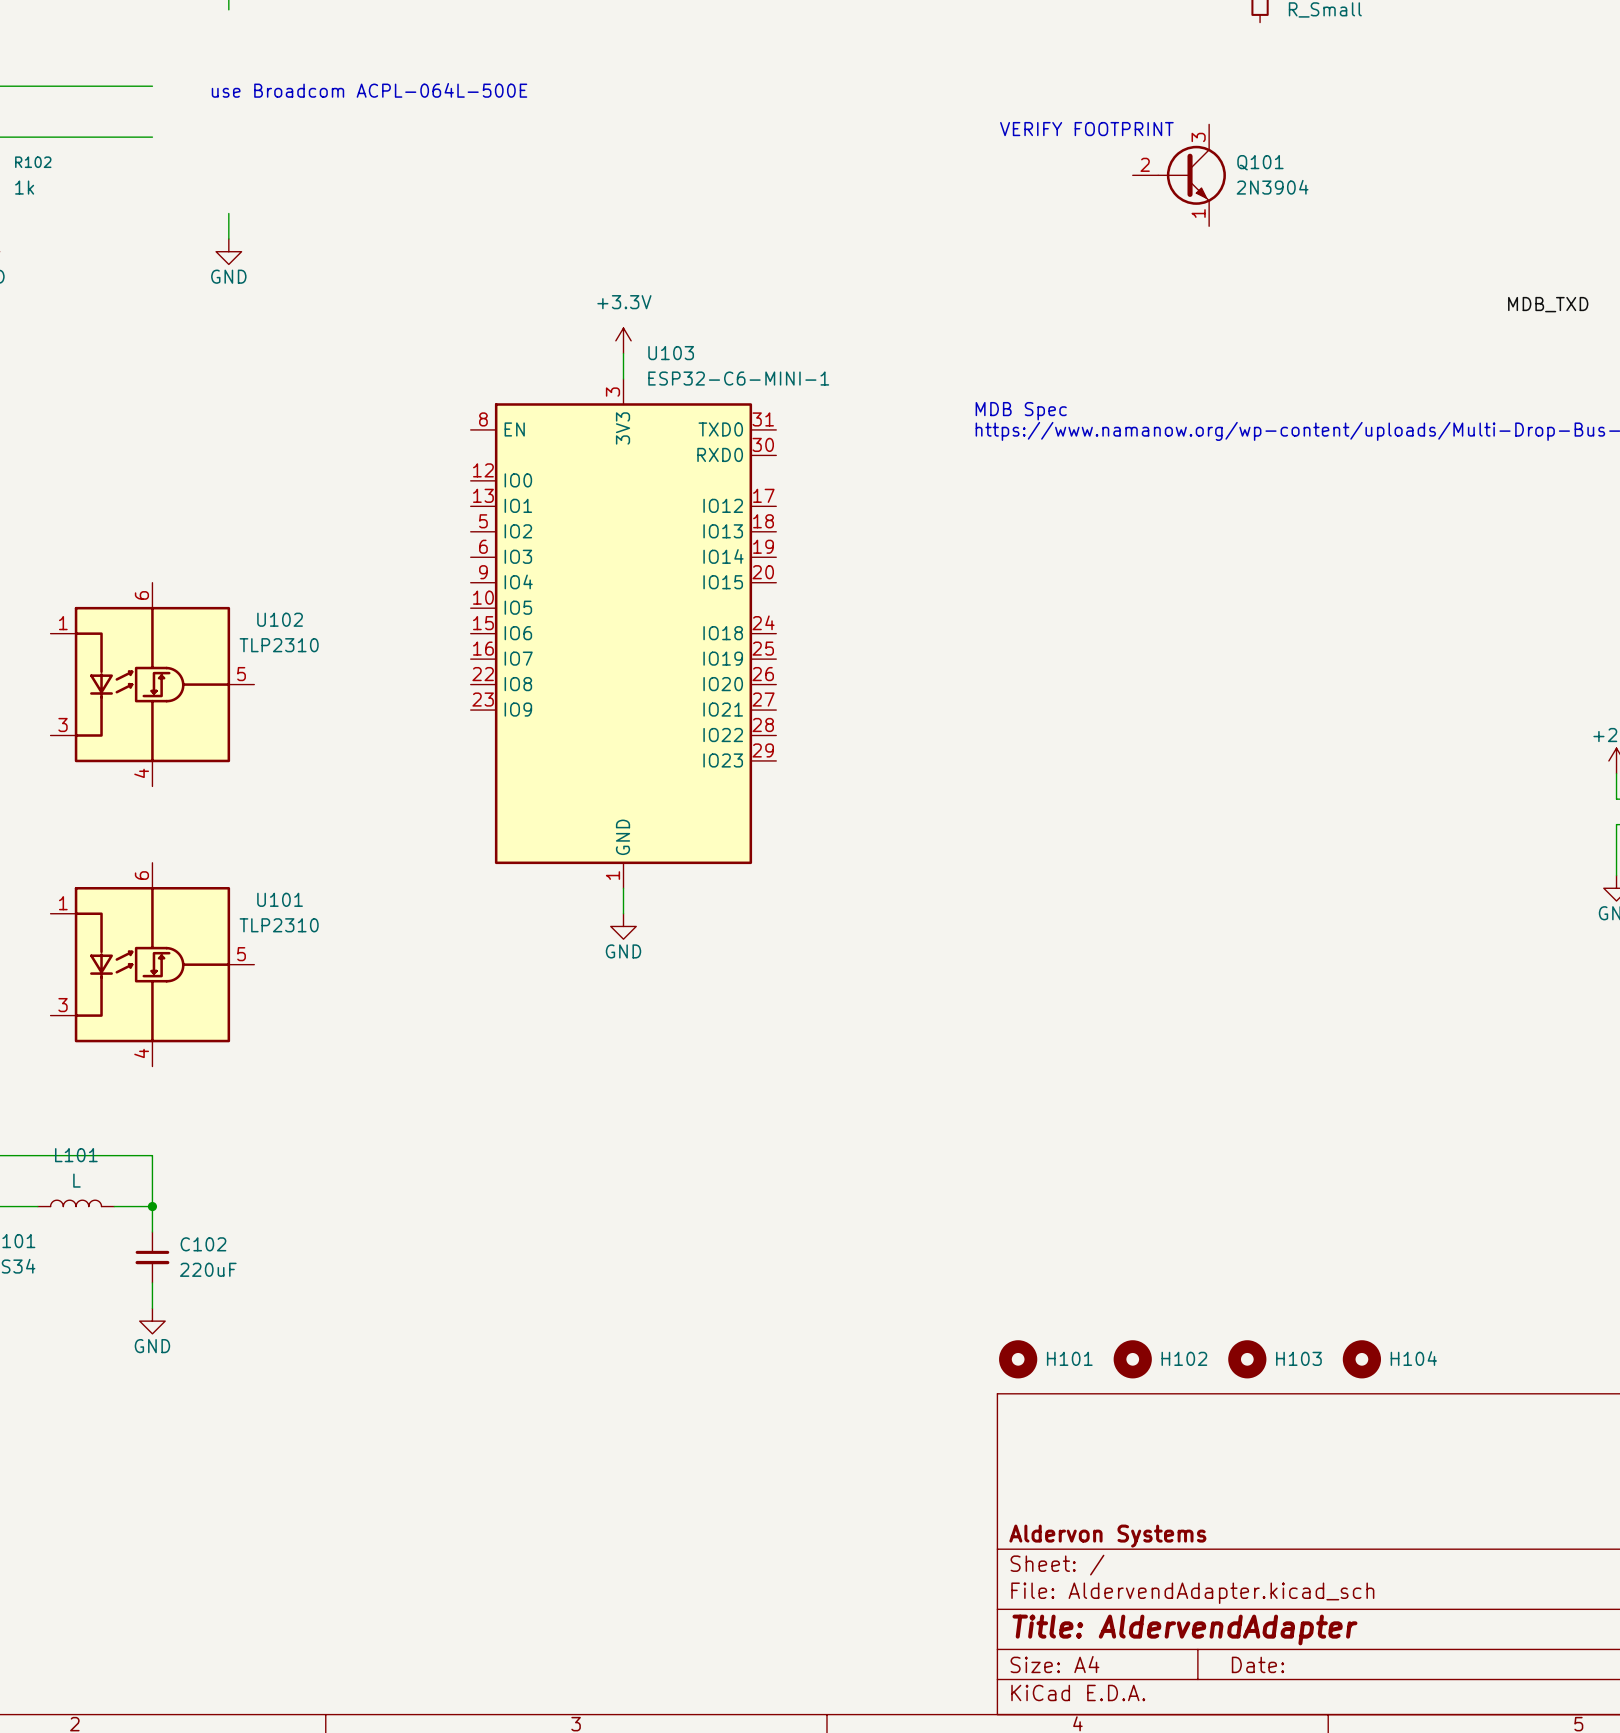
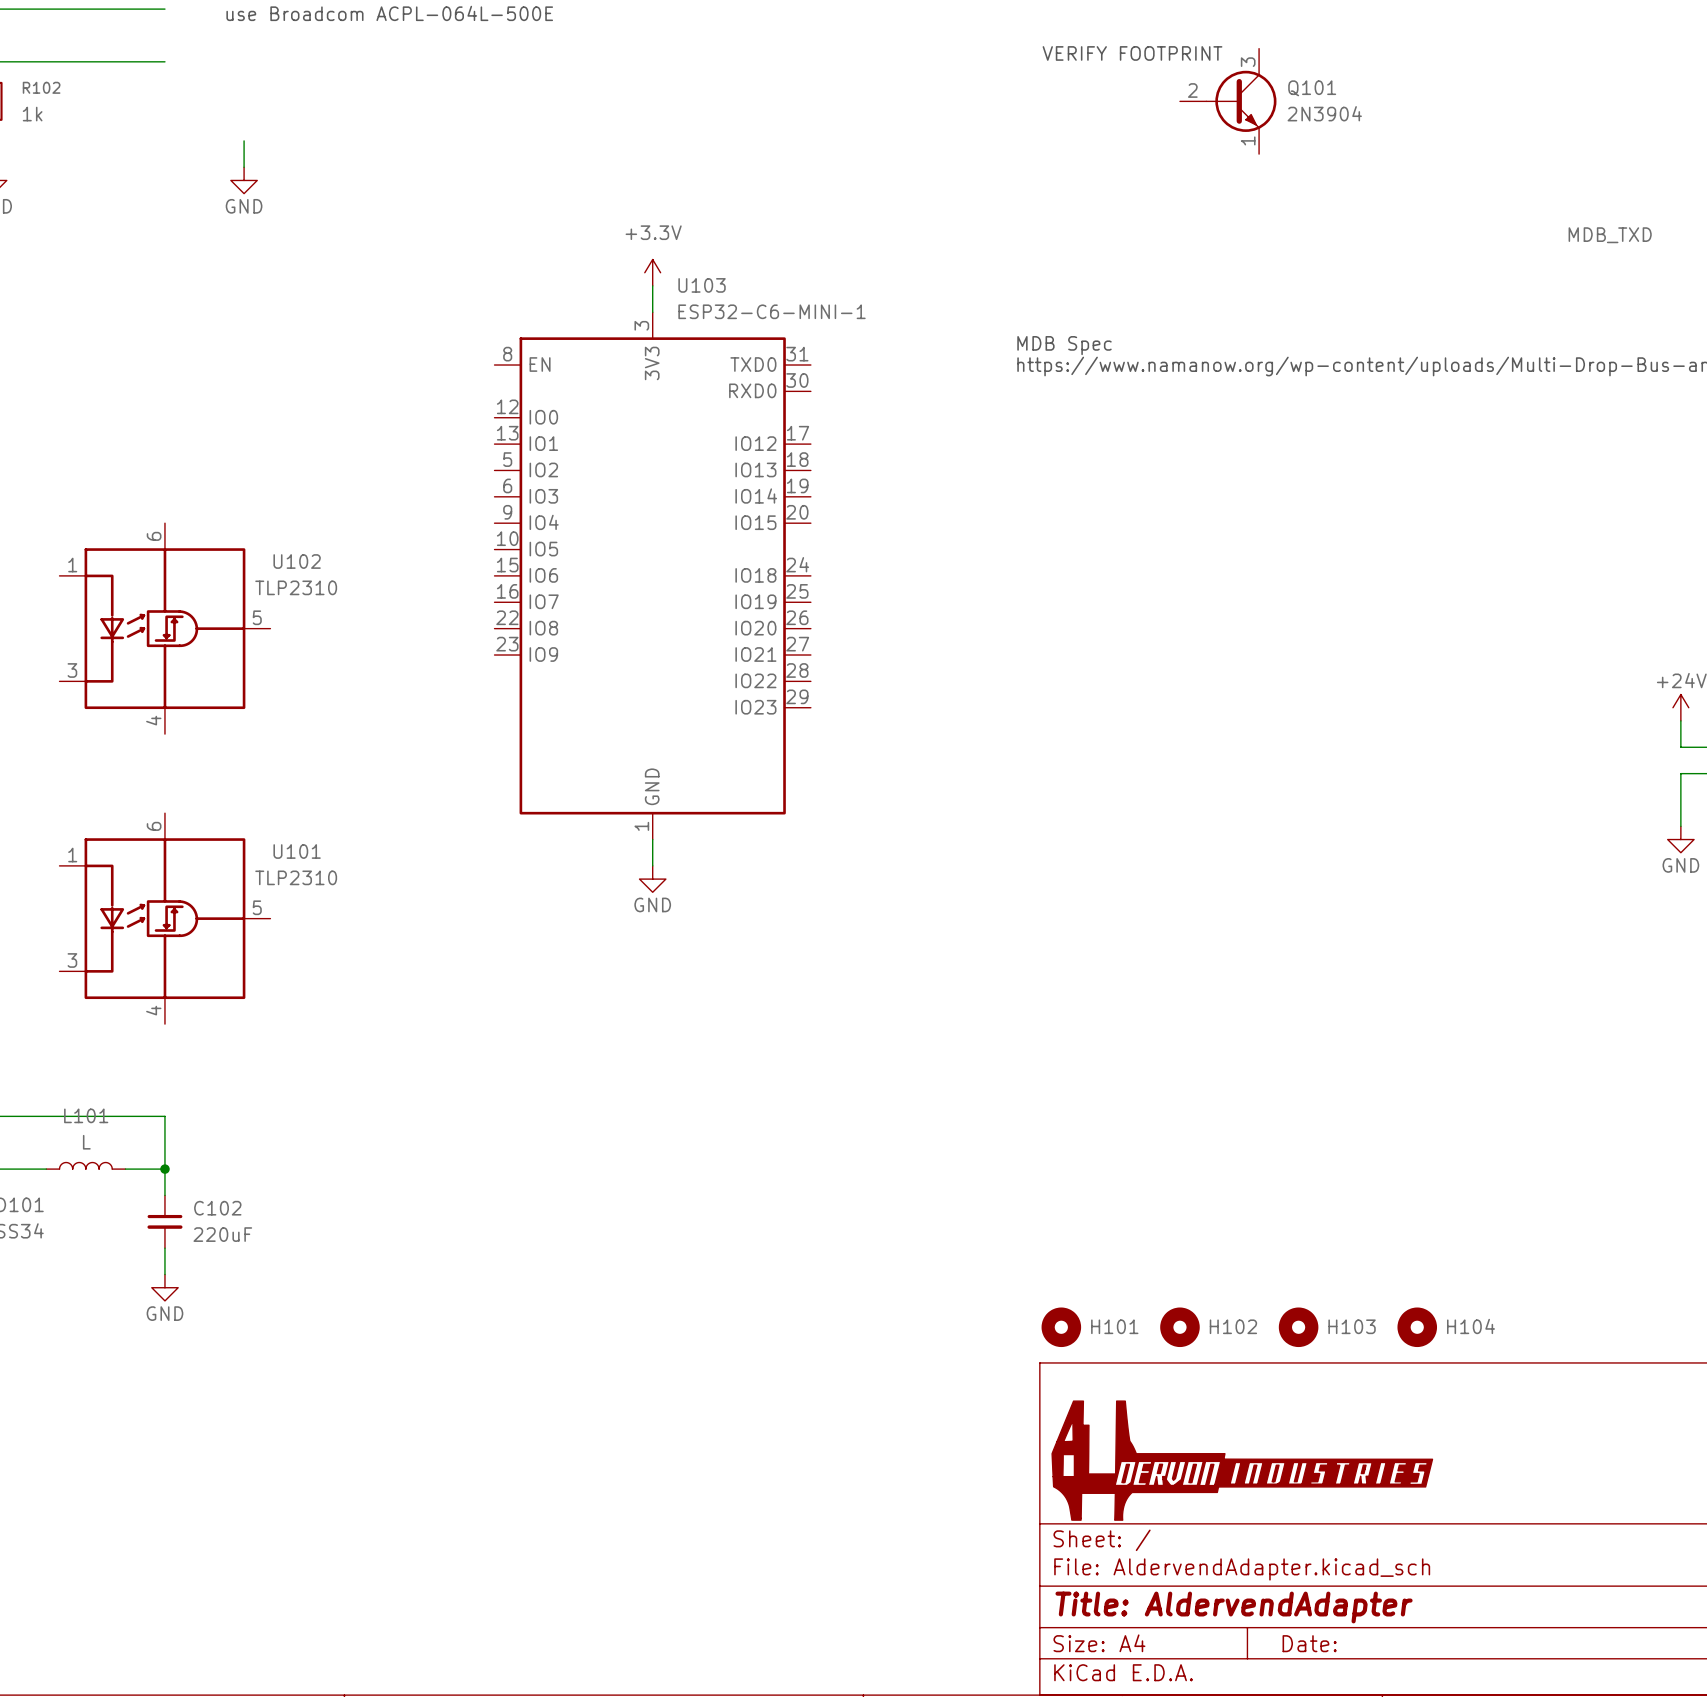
part: none -> (1242, 1460)
title block: Aldervon Systems (1107, 1536) -> none

